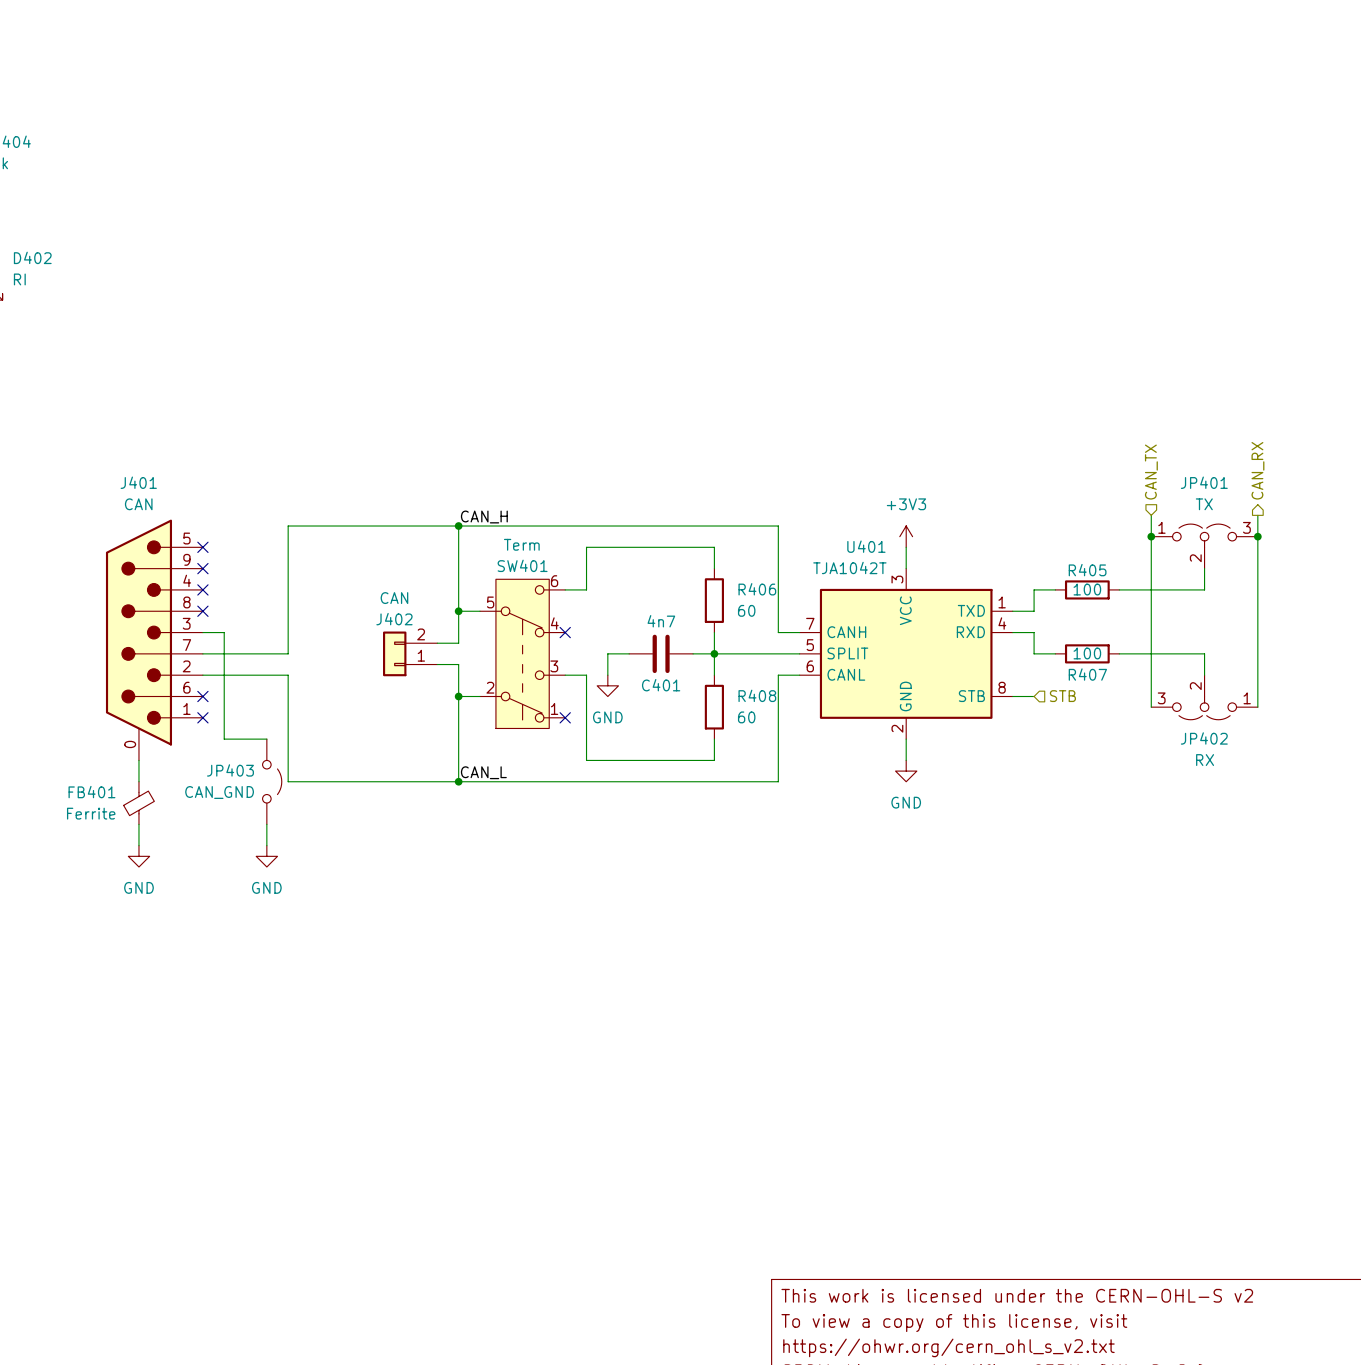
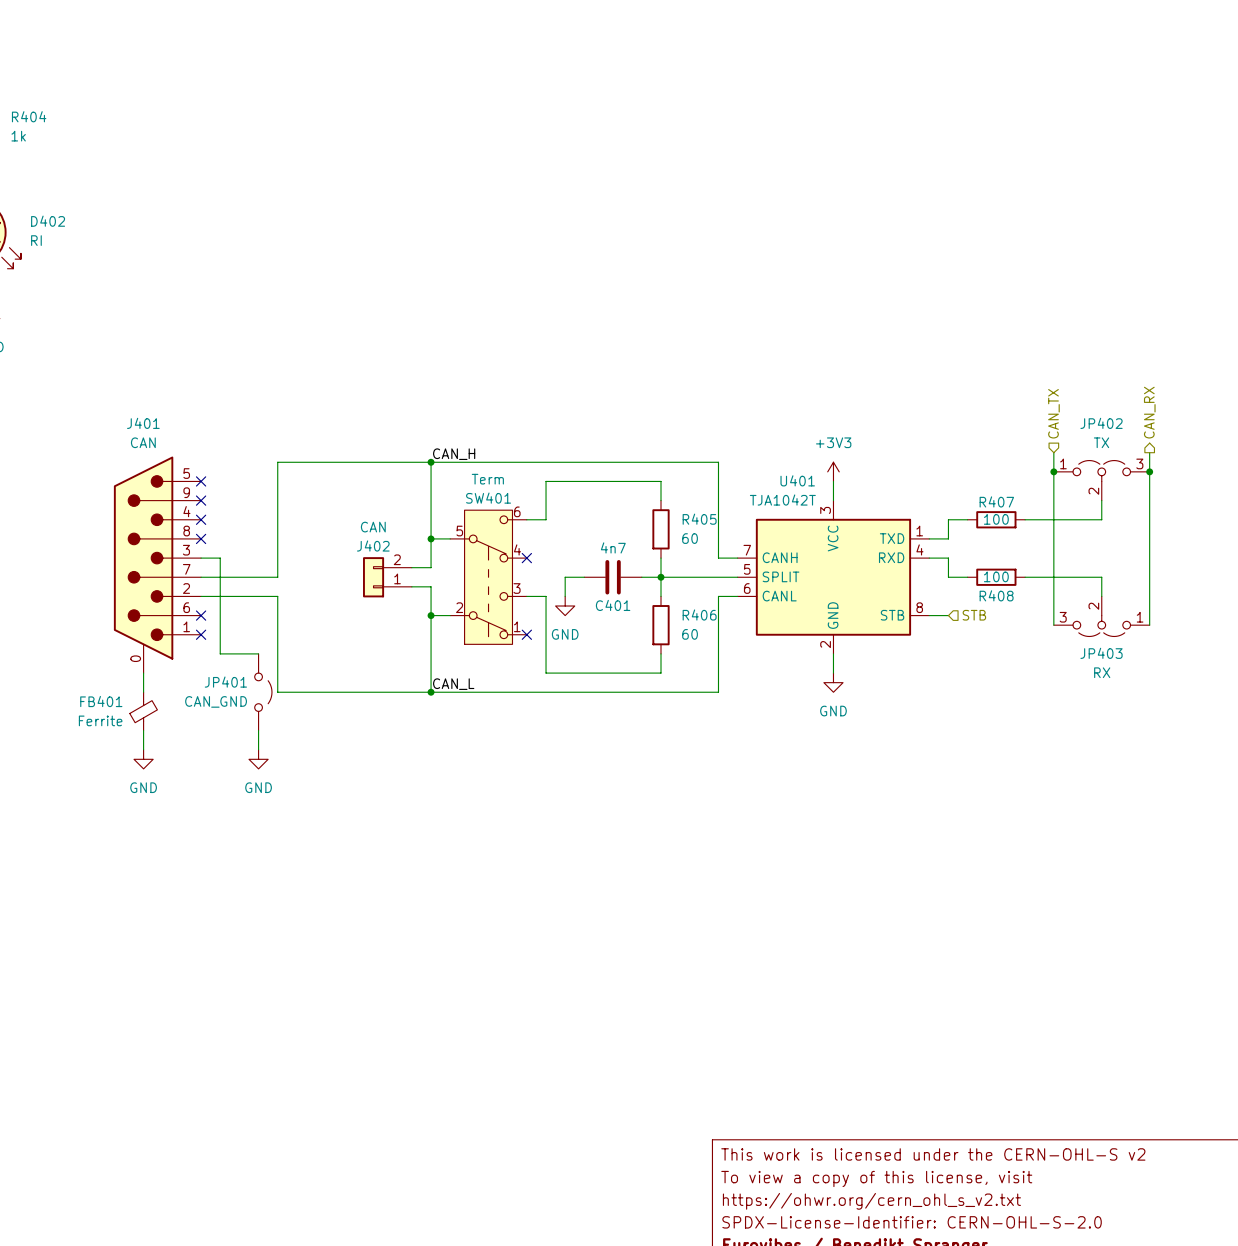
JP401 name: JP401 (1204, 482) -> JP402 (1101, 423)
R405 name: R405 (1087, 570) -> R407 (996, 501)
R406 name: R406 (757, 589) -> R405 (699, 519)
R407 name: R407 (1087, 674) -> R408 (996, 595)
R408 name: R408 (757, 695) -> R406 (699, 615)
JP402 name: JP402 (1204, 738) -> JP403 (1101, 653)
JP403 name: JP403 (230, 770) -> JP401 (225, 682)

